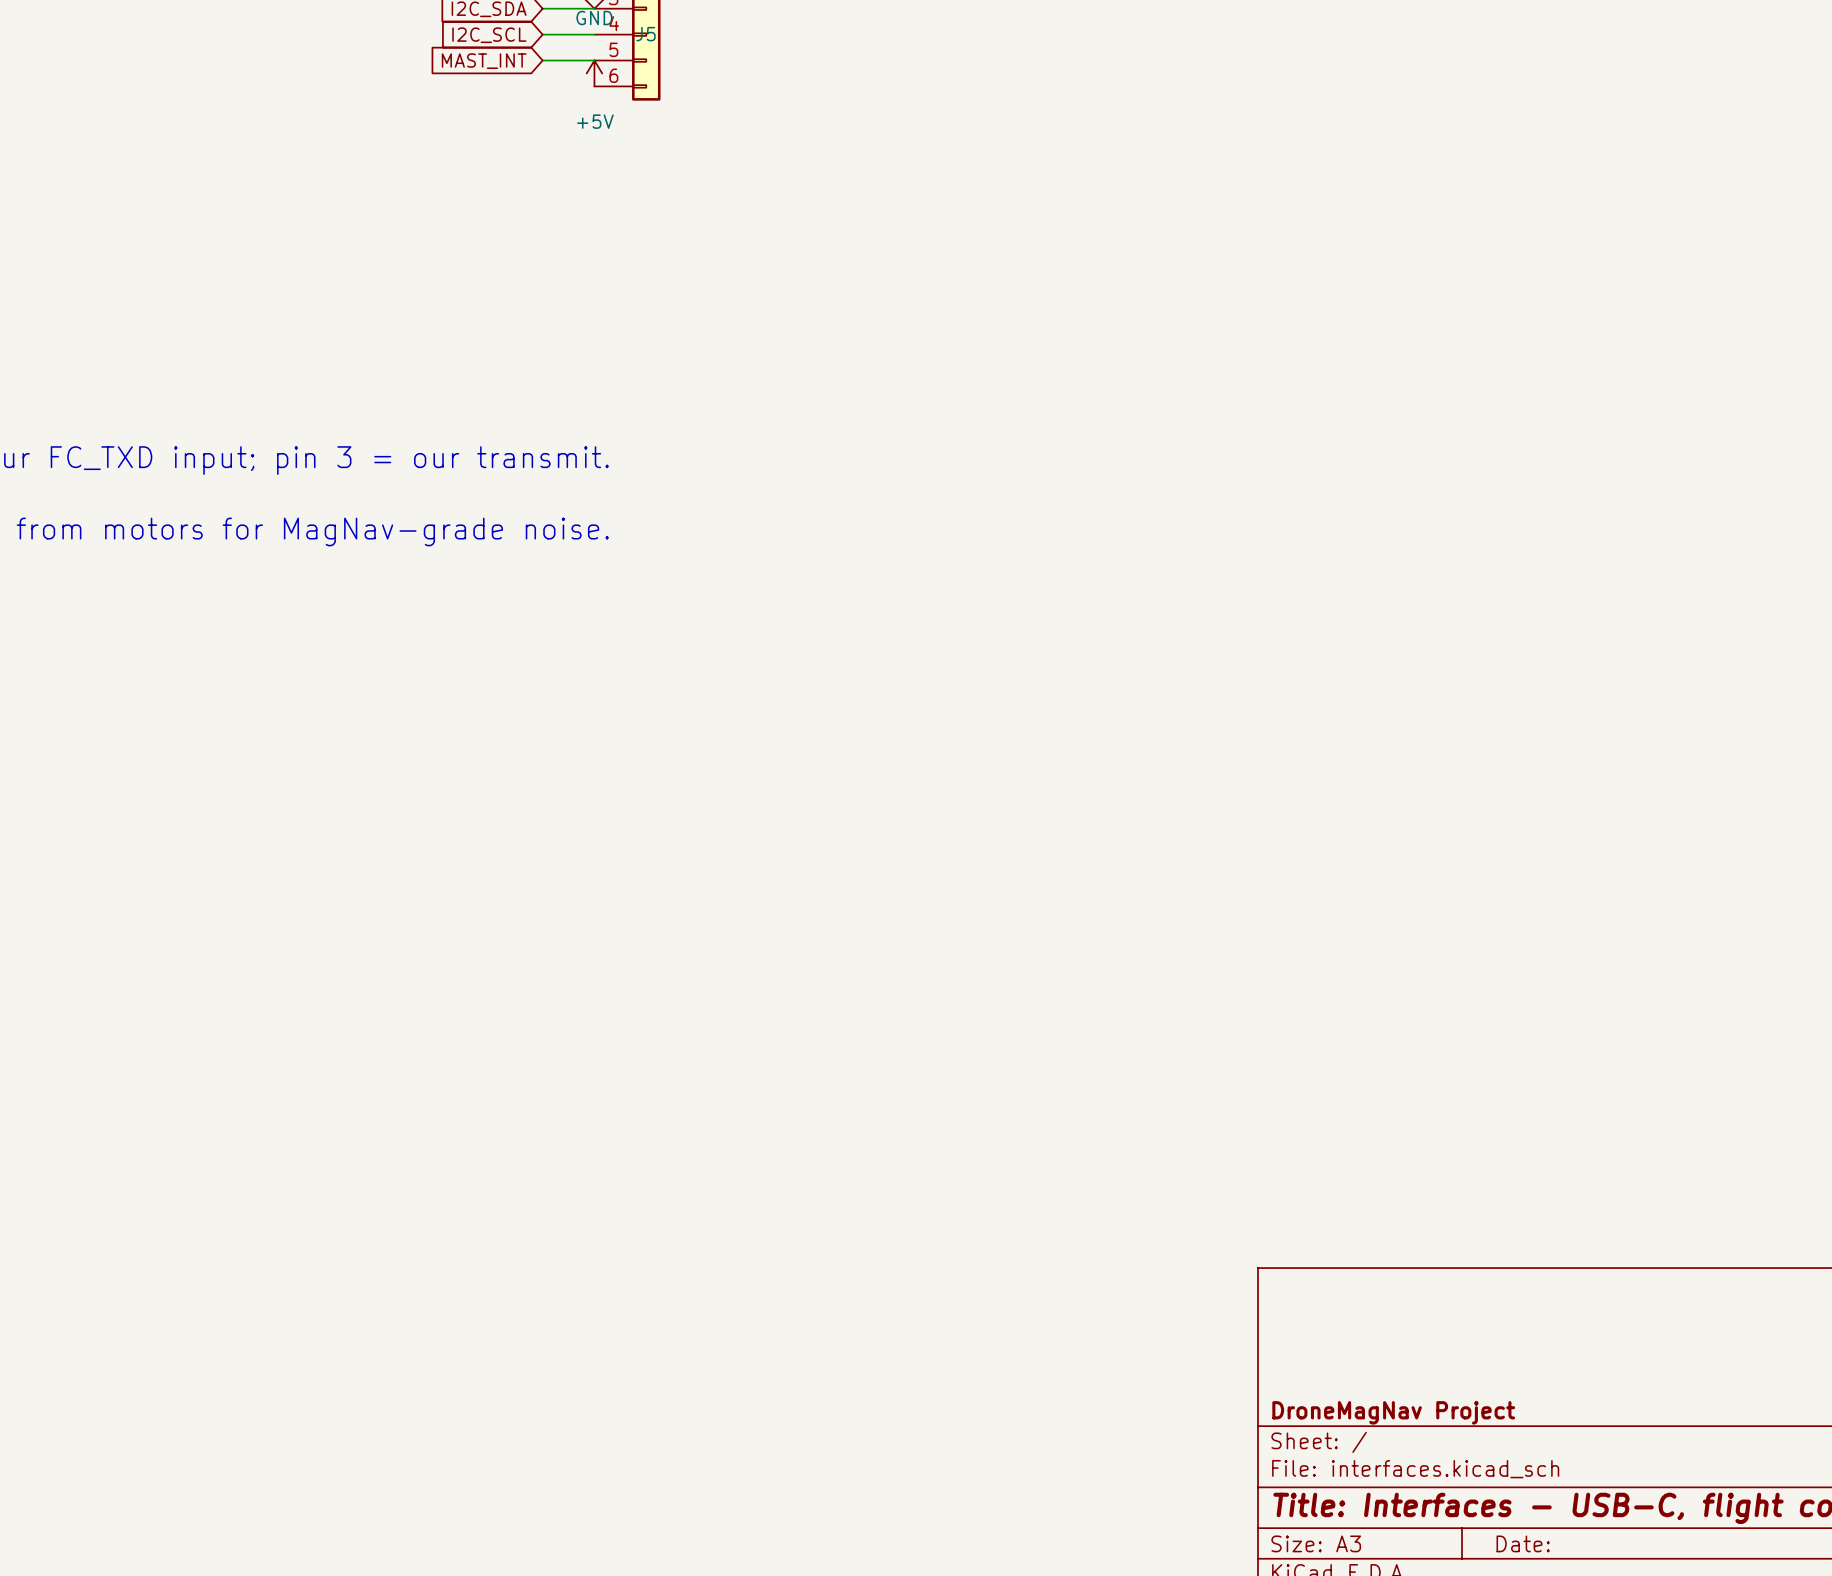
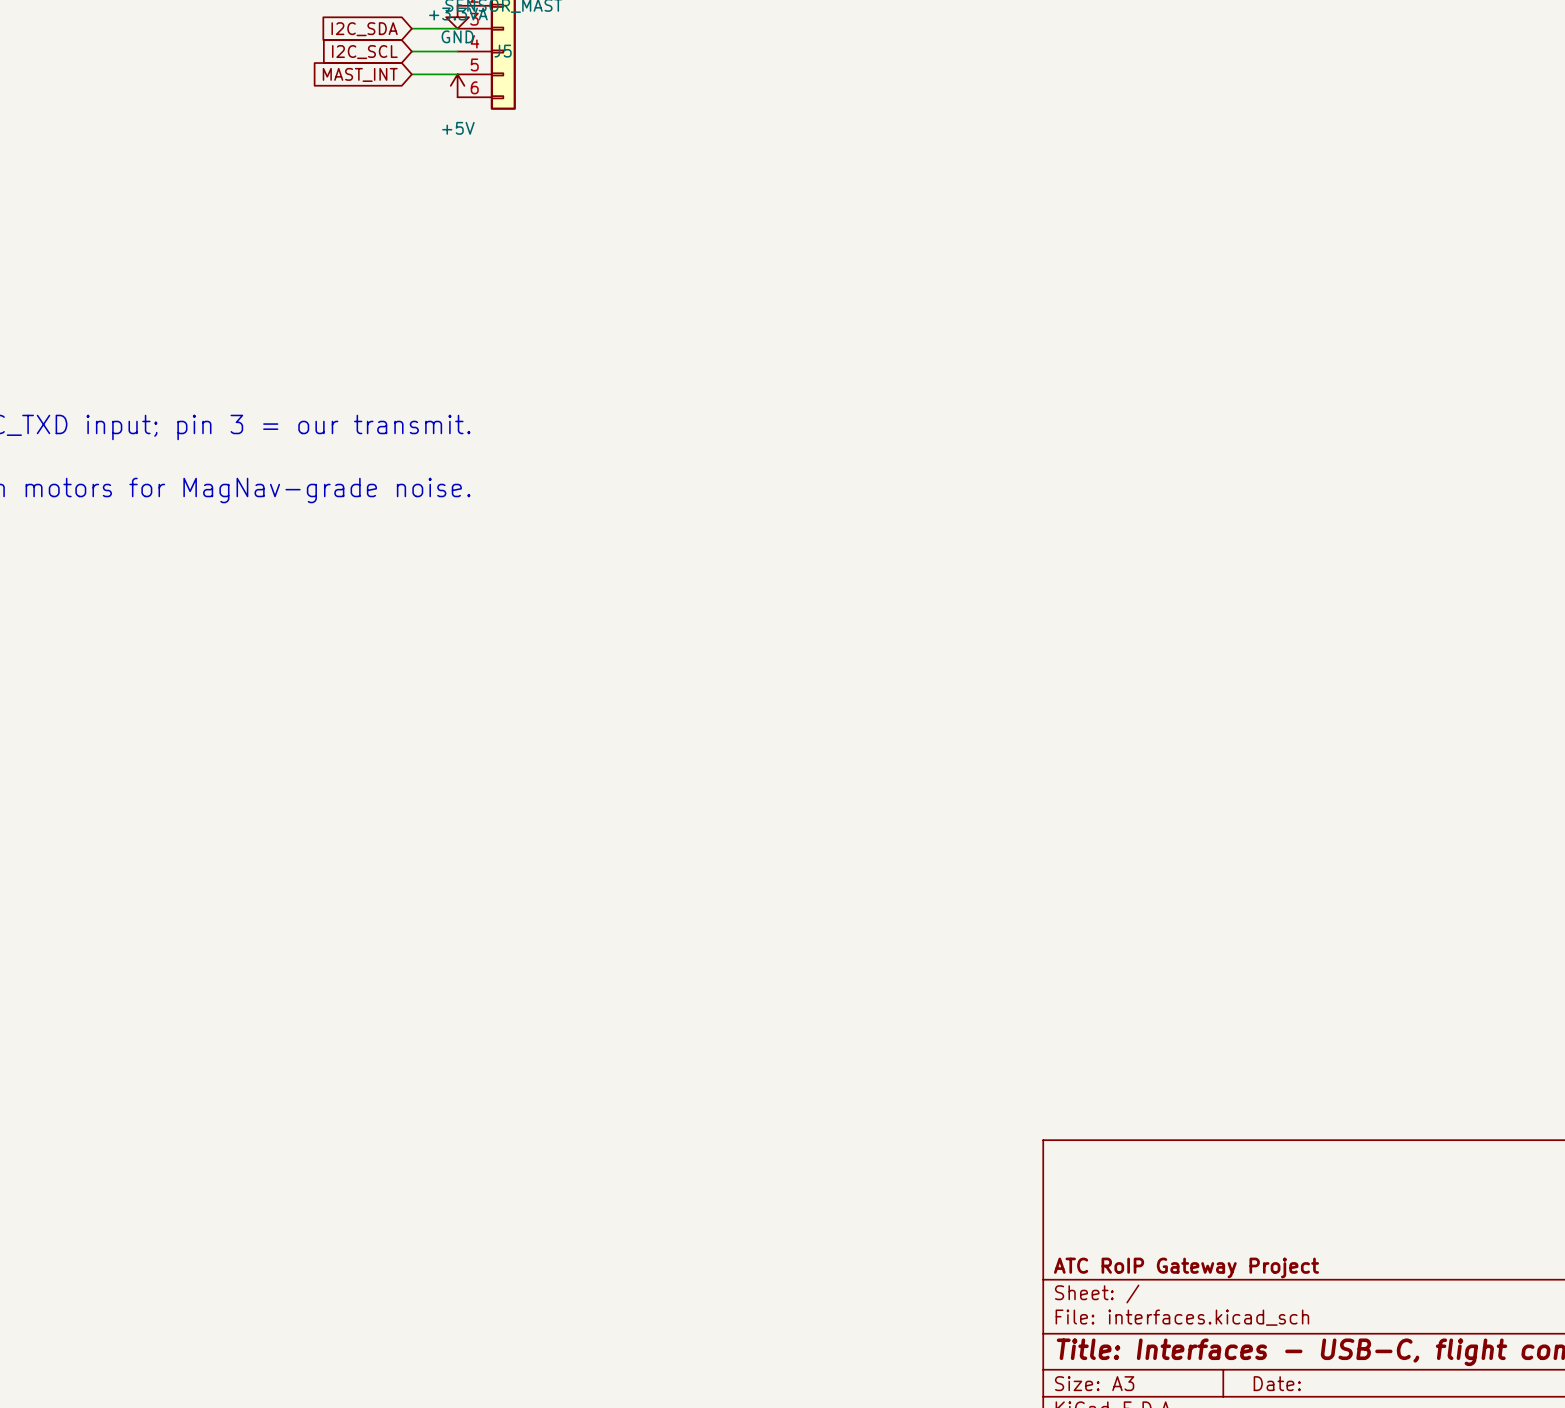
title block: DroneMagNav Project (1393, 1412) -> ATC RoIP Gateway Project (1186, 1267)

